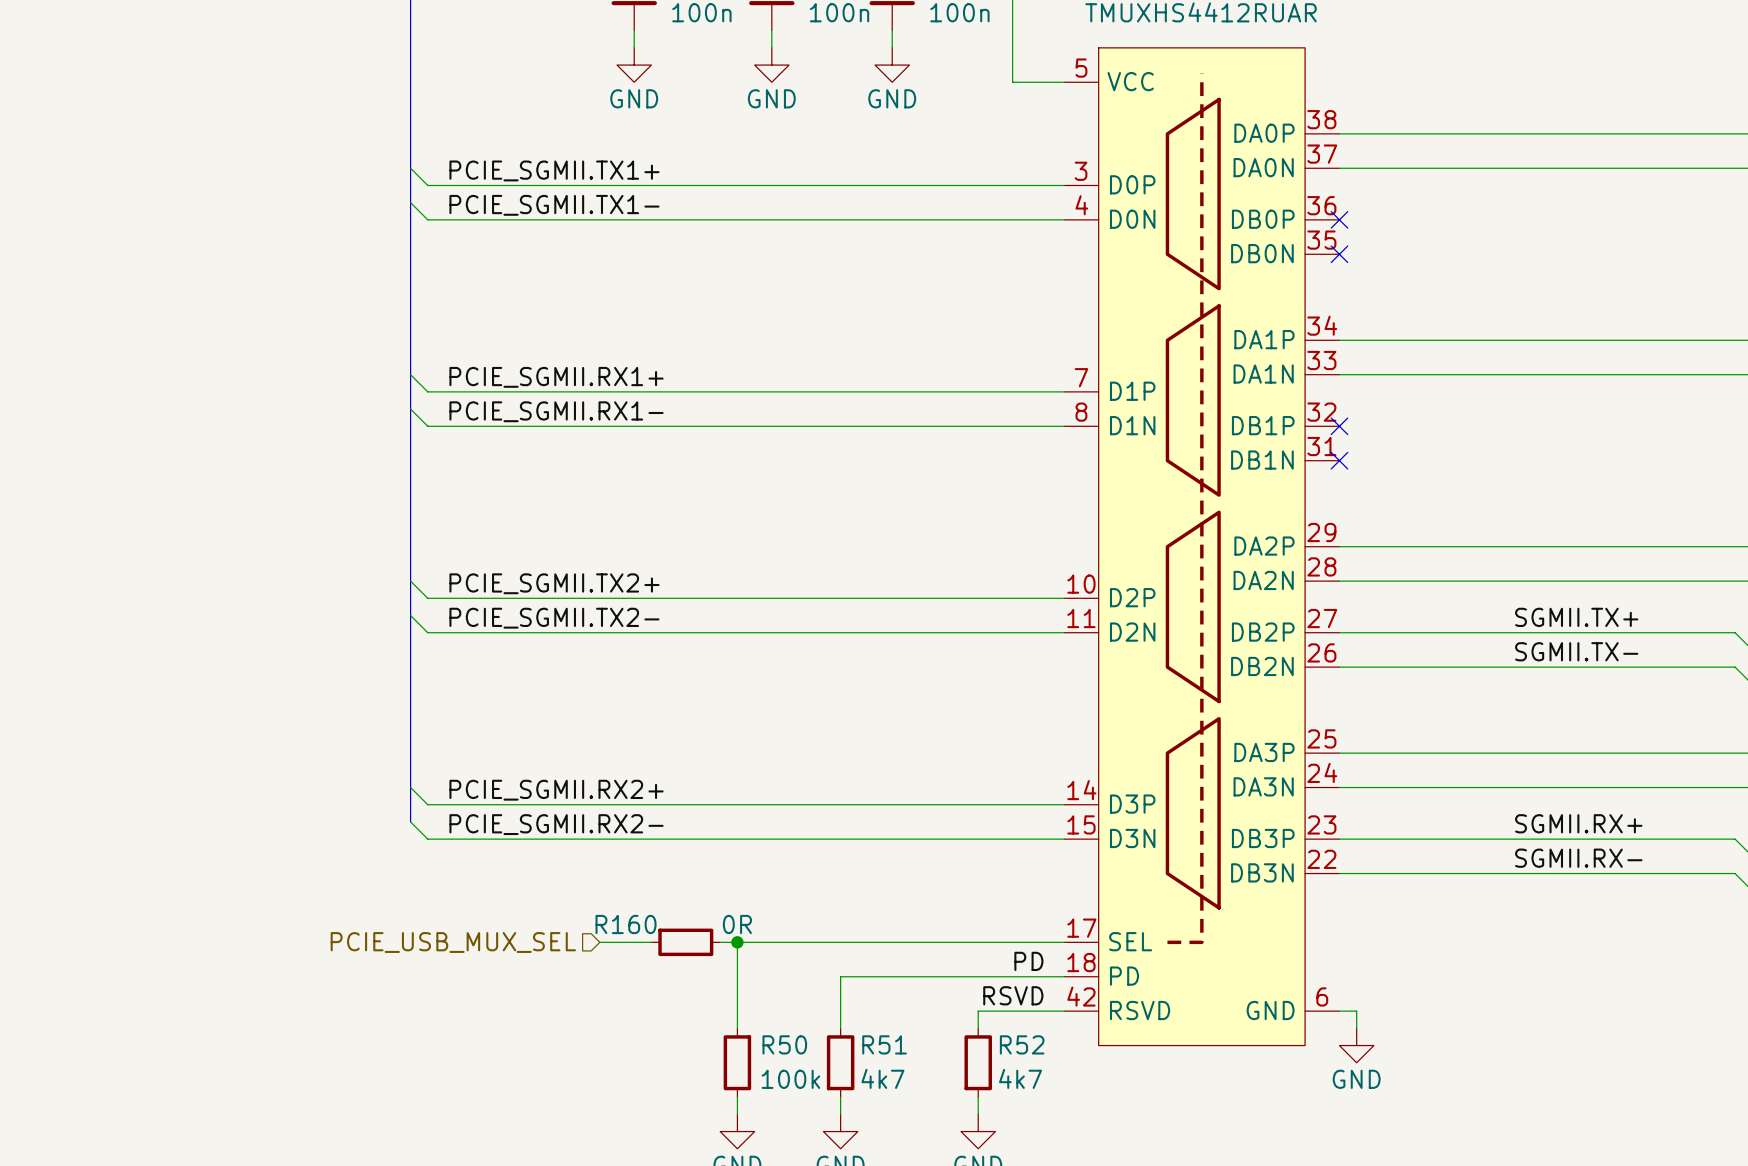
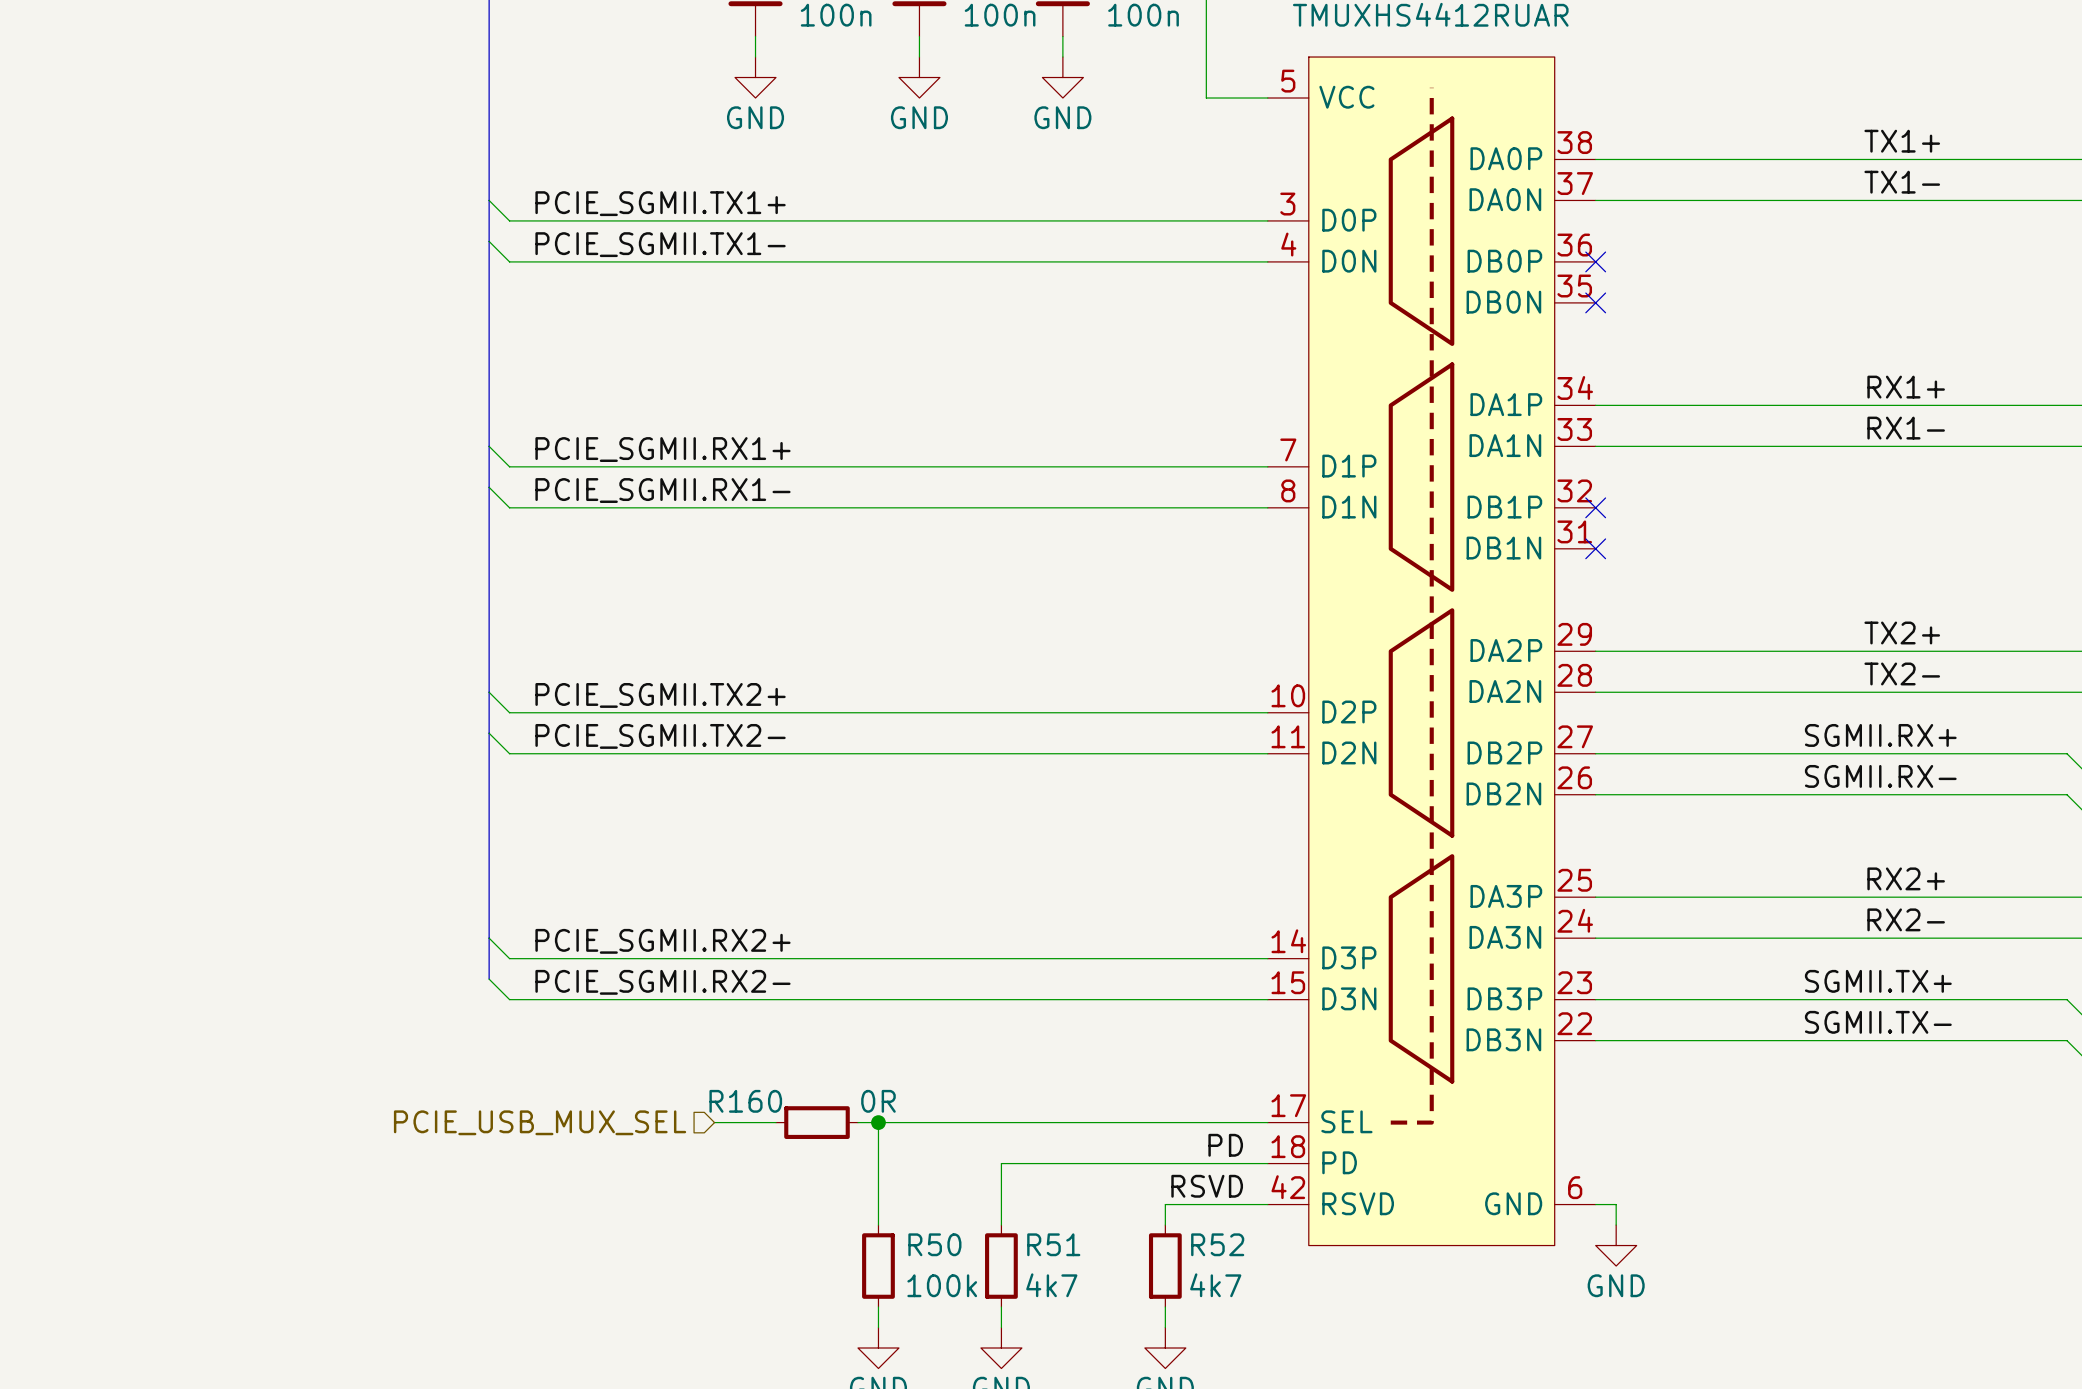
label: none -> TX1+ (1902, 141)
label: none -> TX1- (1902, 182)
label: none -> RX1+ (1906, 387)
label: none -> RX1- (1906, 428)
label: none -> TX2+ (1902, 632)
label: none -> TX2- (1902, 673)
label: SGMII.TX+ (1576, 617) -> SGMII.RX+ (1880, 735)
label: SGMII.TX- (1576, 651) -> SGMII.RX- (1880, 776)
label: none -> RX2+ (1906, 878)
label: none -> RX2- (1906, 919)
label: SGMII.RX+ (1578, 823) -> SGMII.TX+ (1878, 981)
label: SGMII.RX- (1578, 858) -> SGMII.TX- (1878, 1022)

